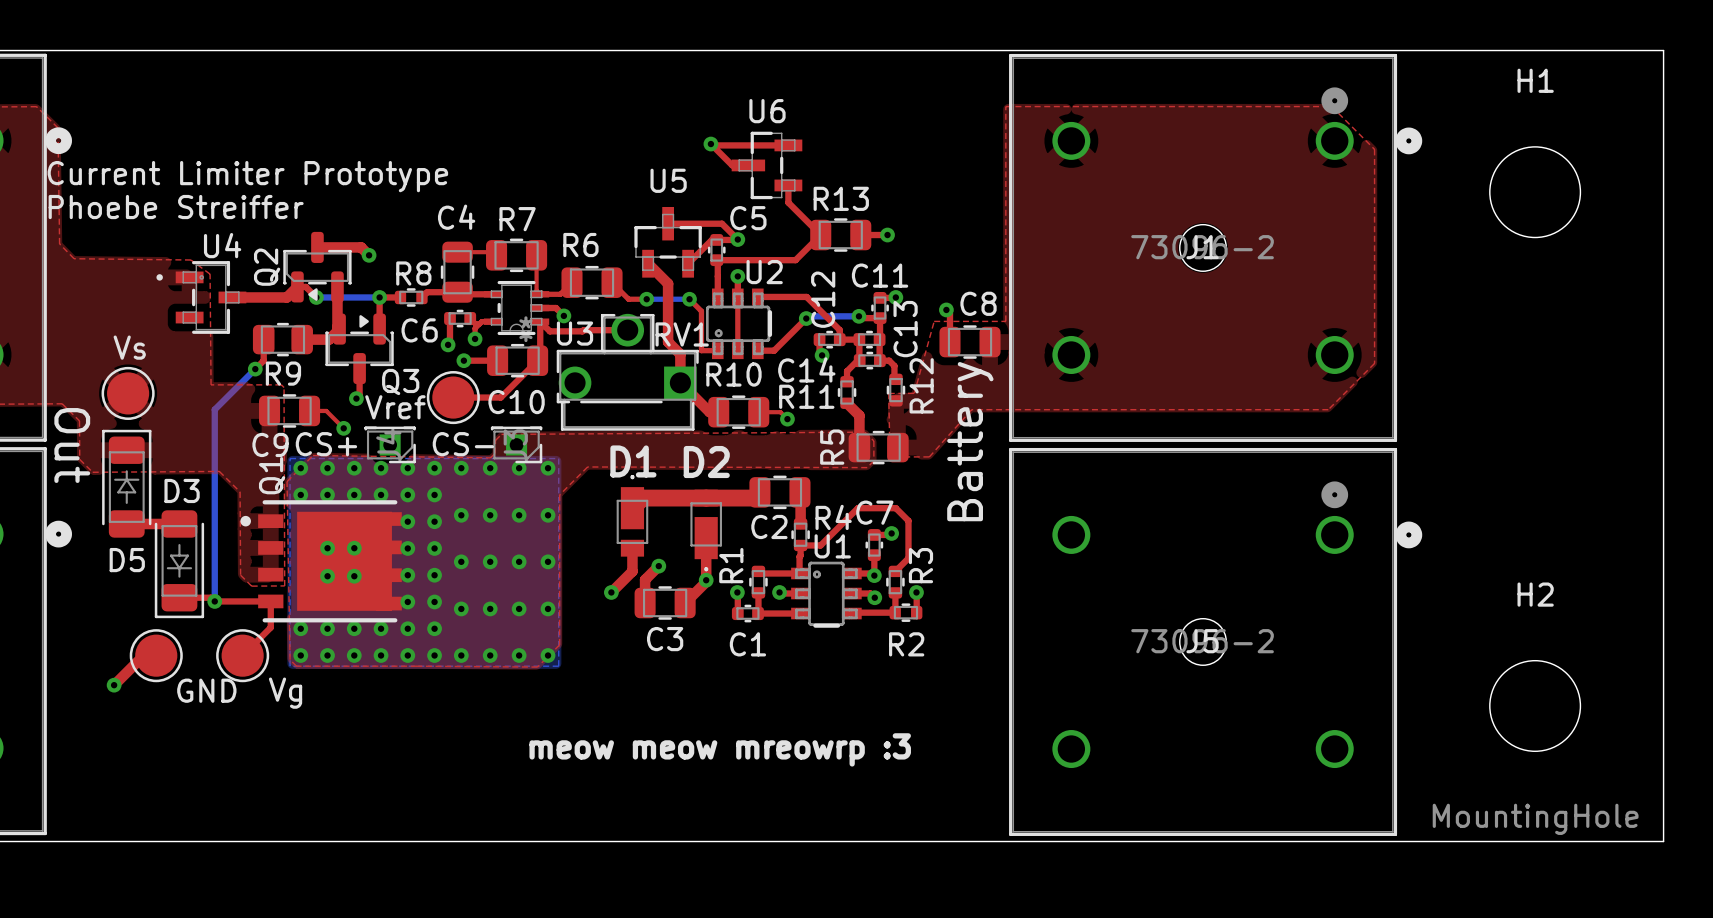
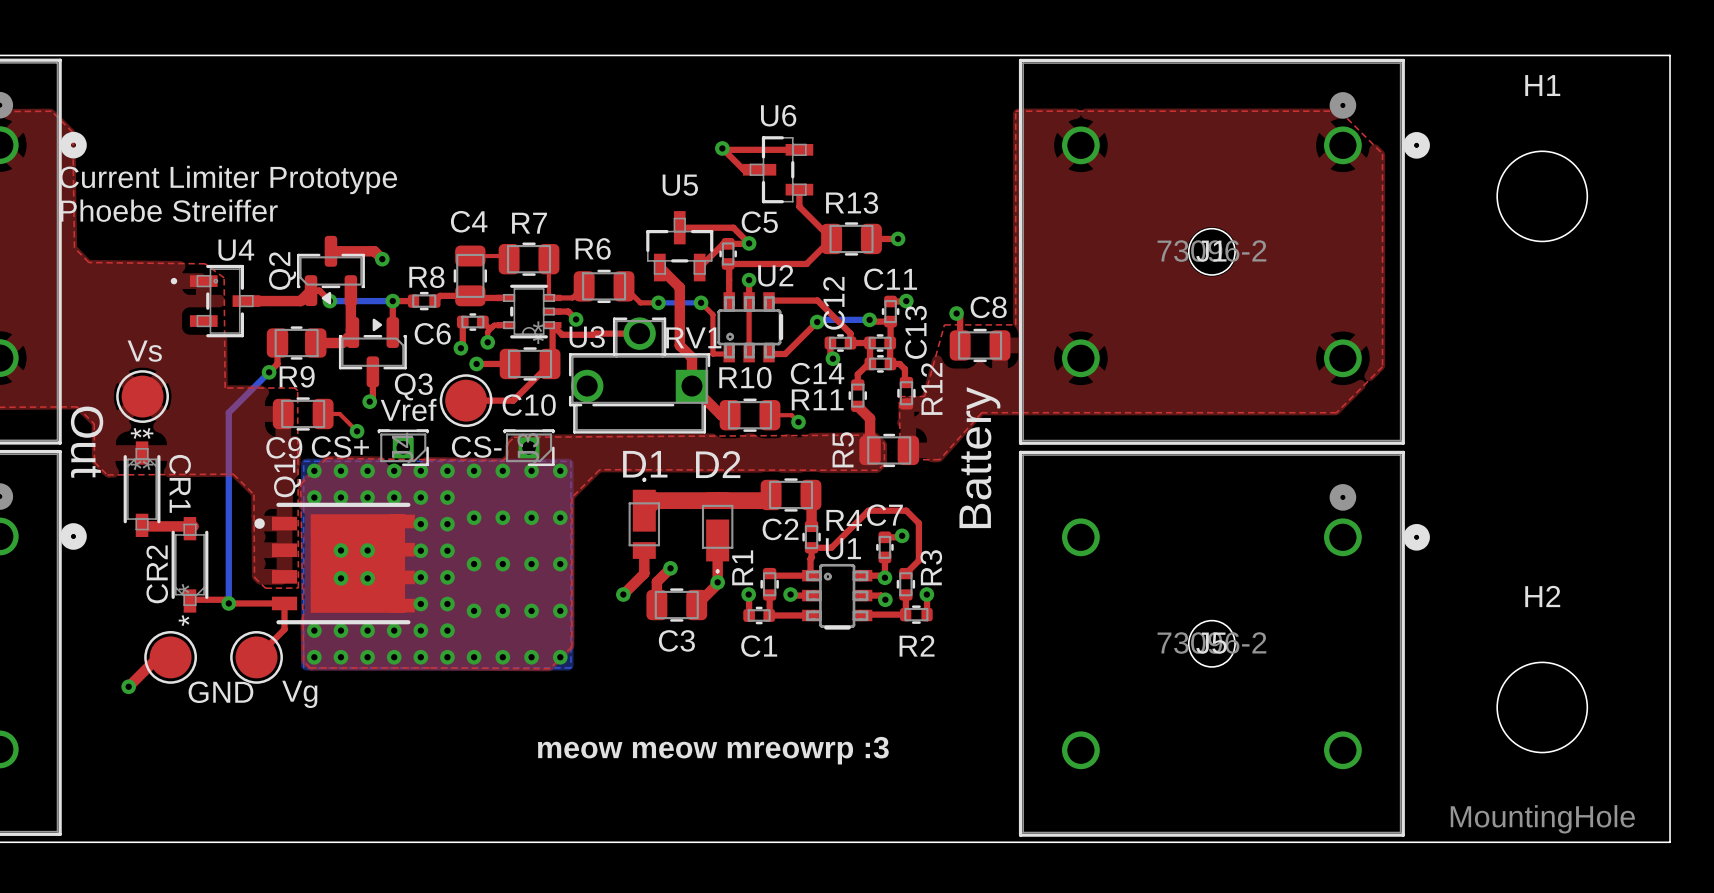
D5: (126, 483) -> none
CR1: none -> (142, 489)
CR2: none -> (189, 564)
D3: (179, 564) -> none

